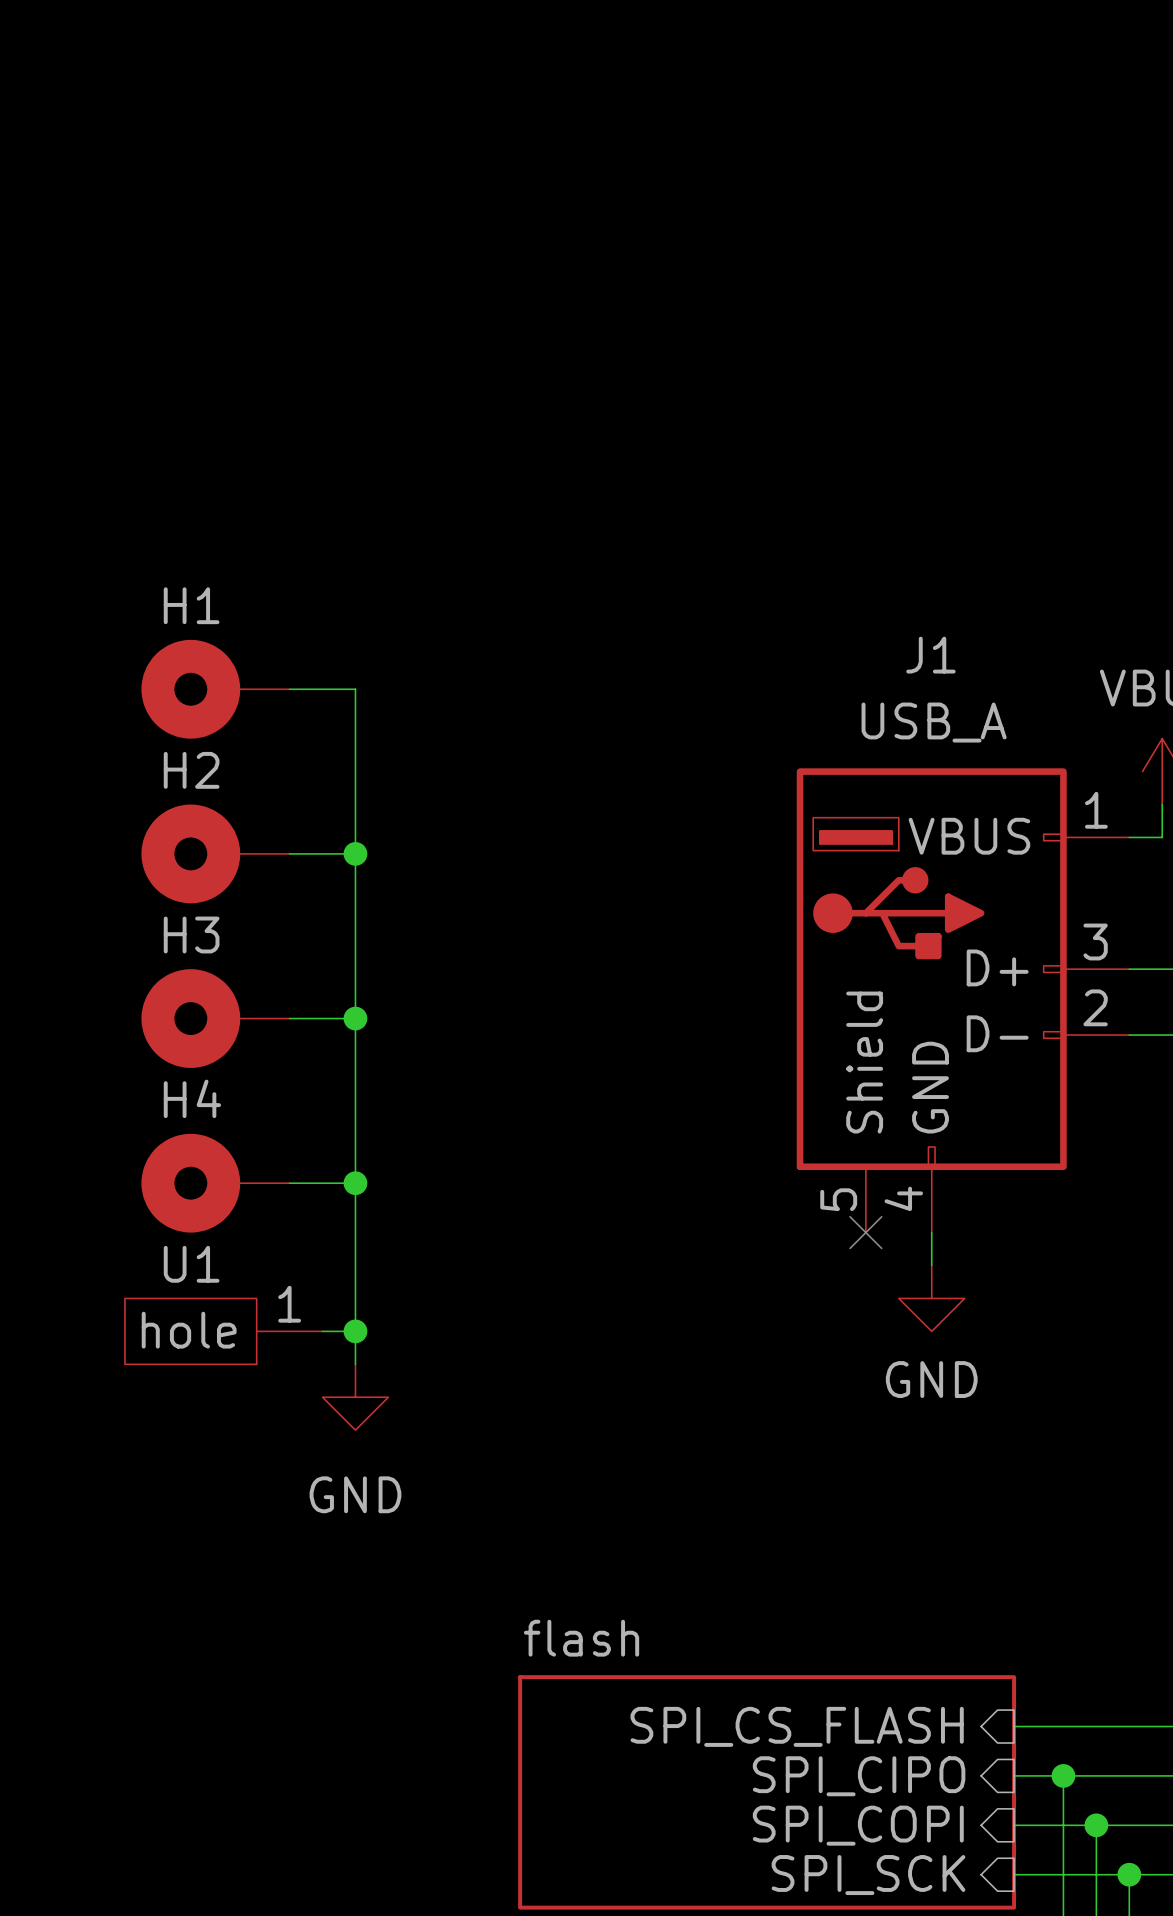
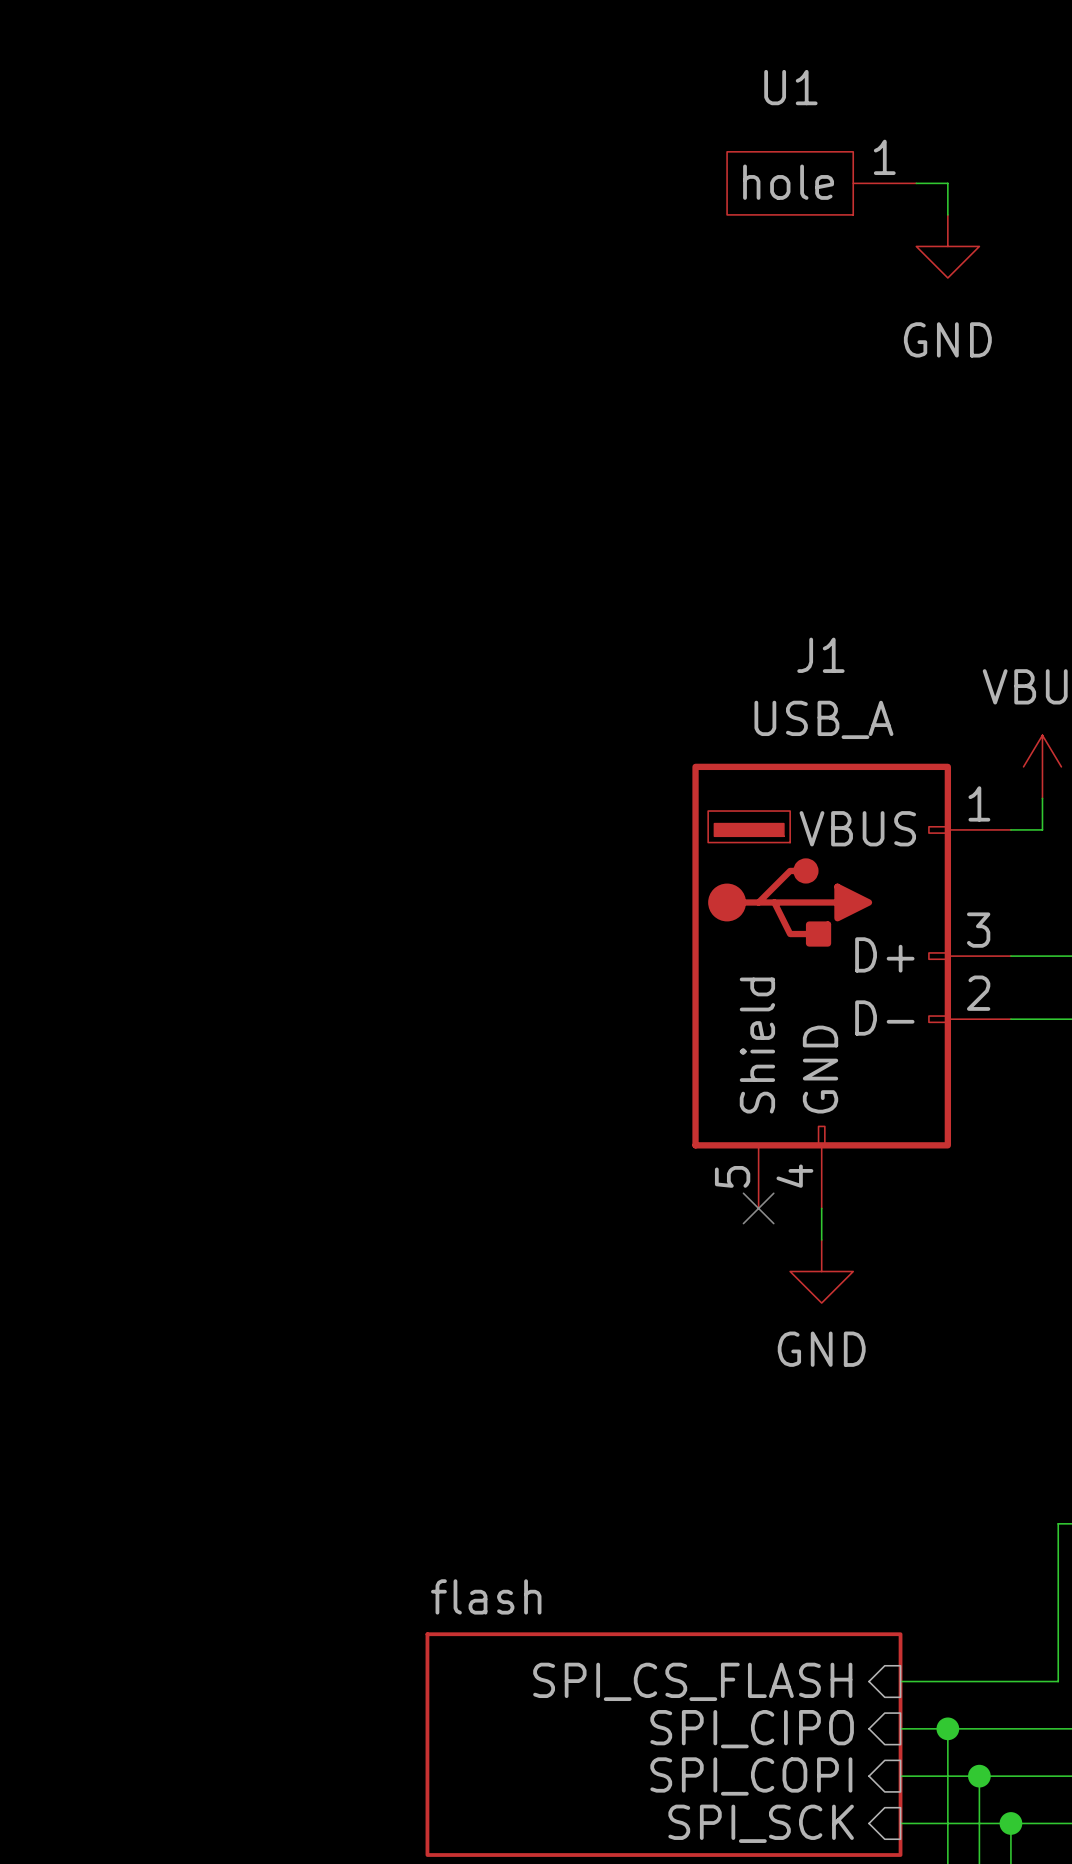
wire: none -> (916, 183) (947, 183) (947, 214)
power symbol: none -> GND (947, 246)
H1: (215, 689) -> none
wire: (289, 689) (355, 689) (355, 1364) -> none
H2: (215, 853) -> none
wire: (289, 853) (355, 853) -> none
junction: (355, 853) -> none
H3: (215, 1018) -> none
wire: (289, 1018) (355, 1018) -> none
junction: (355, 1018) -> none
H4: (215, 1183) -> none
wire: (289, 1183) (355, 1183) -> none
junction: (355, 1183) -> none
U1 name position: U1 (191, 1264) -> U1 (790, 87)
U1 position: (223, 1331) -> (821, 183)
wire: (322, 1331) (355, 1331) -> none
junction: (355, 1331) -> none
power symbol: GND (355, 1397) -> none

